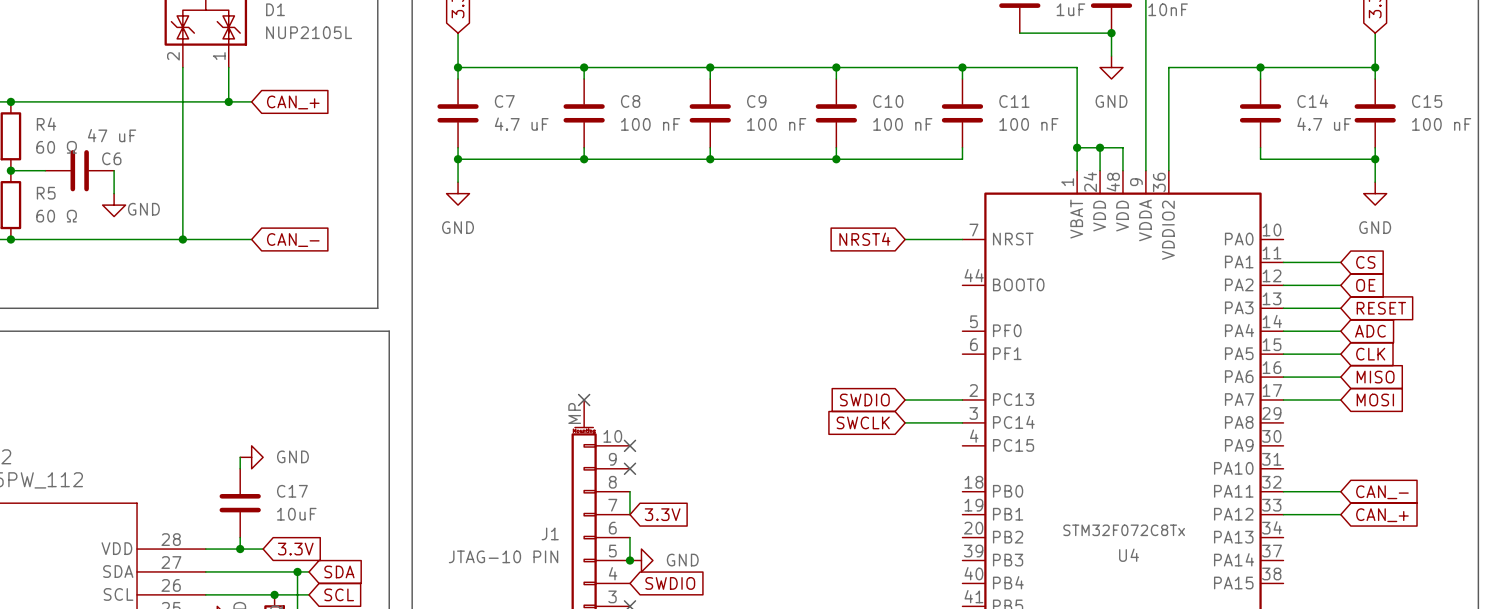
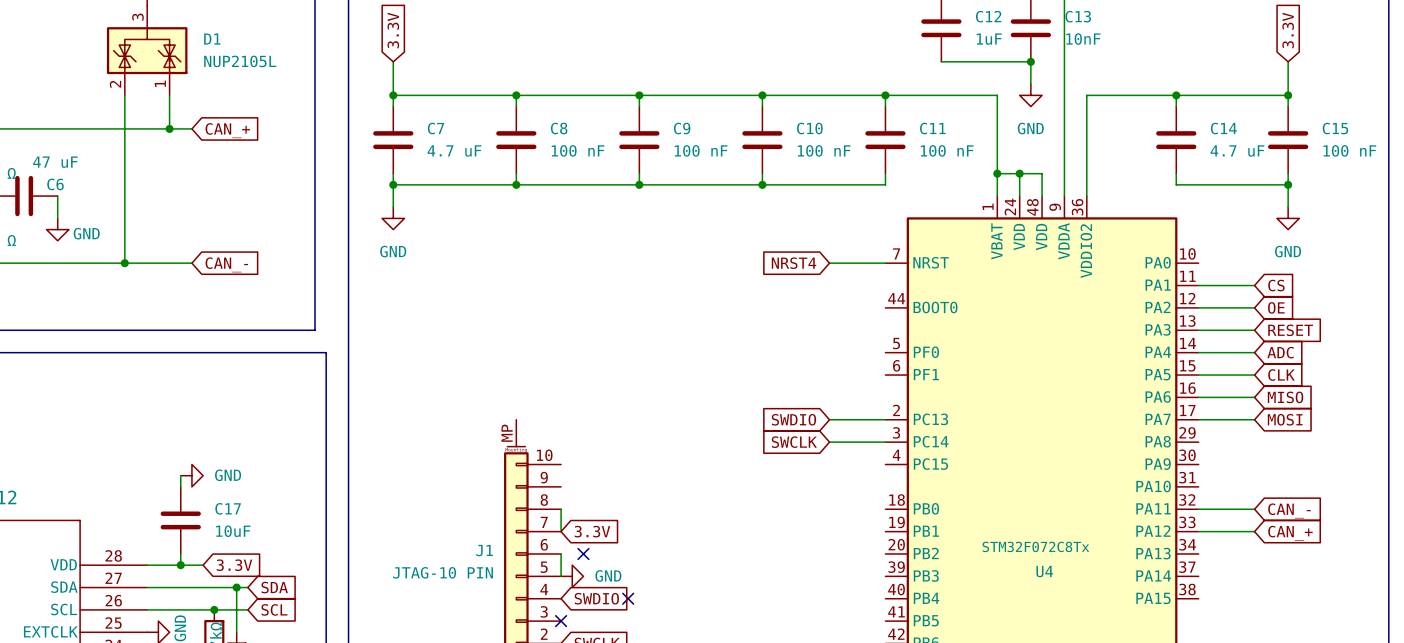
no-connect mark: (584, 400) -> none
no-connect mark: (629, 445) -> none
no-connect mark: (629, 468) -> none
no-connect mark: none -> (583, 553)
junction: (629, 560) -> none
no-connect mark: none -> (628, 598)

